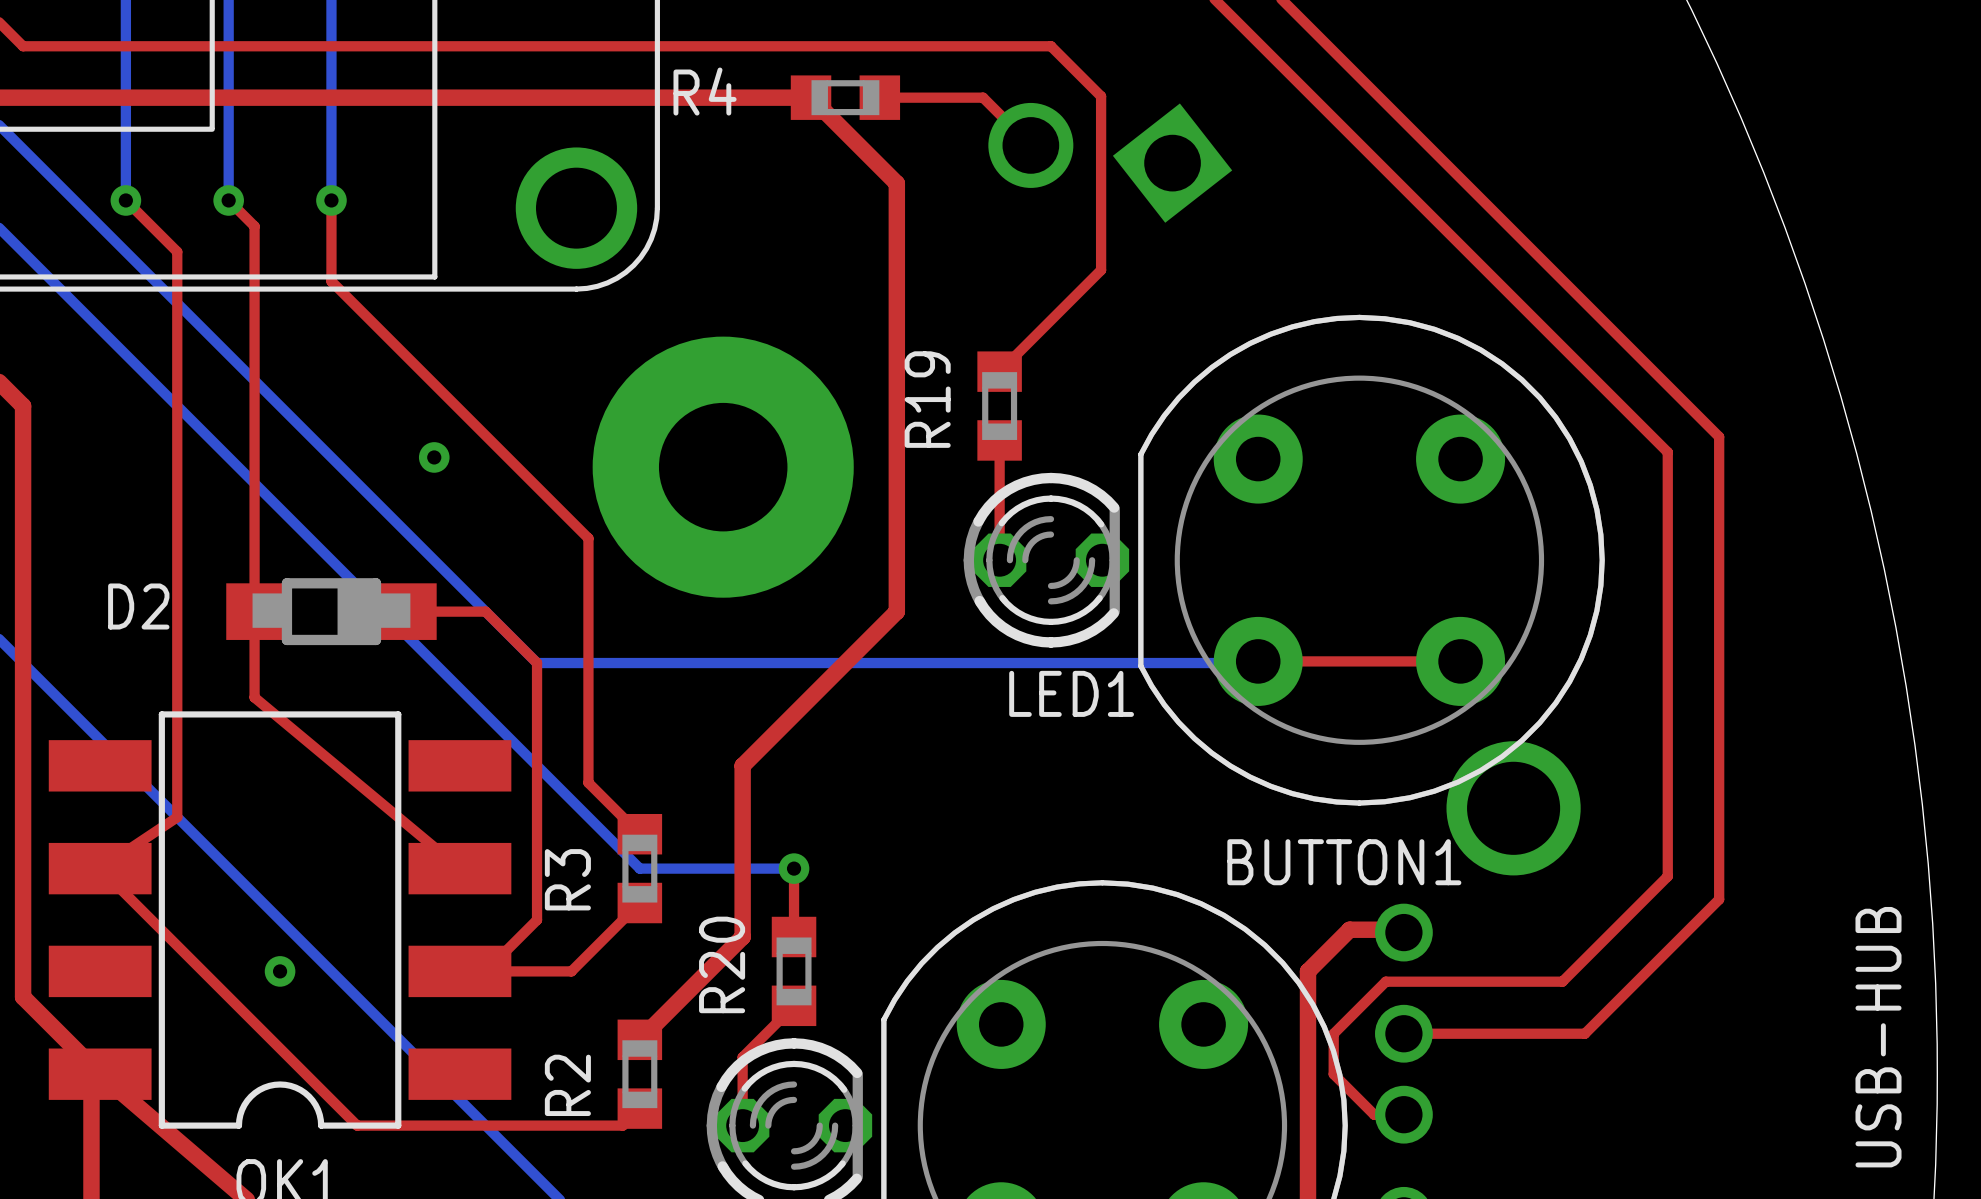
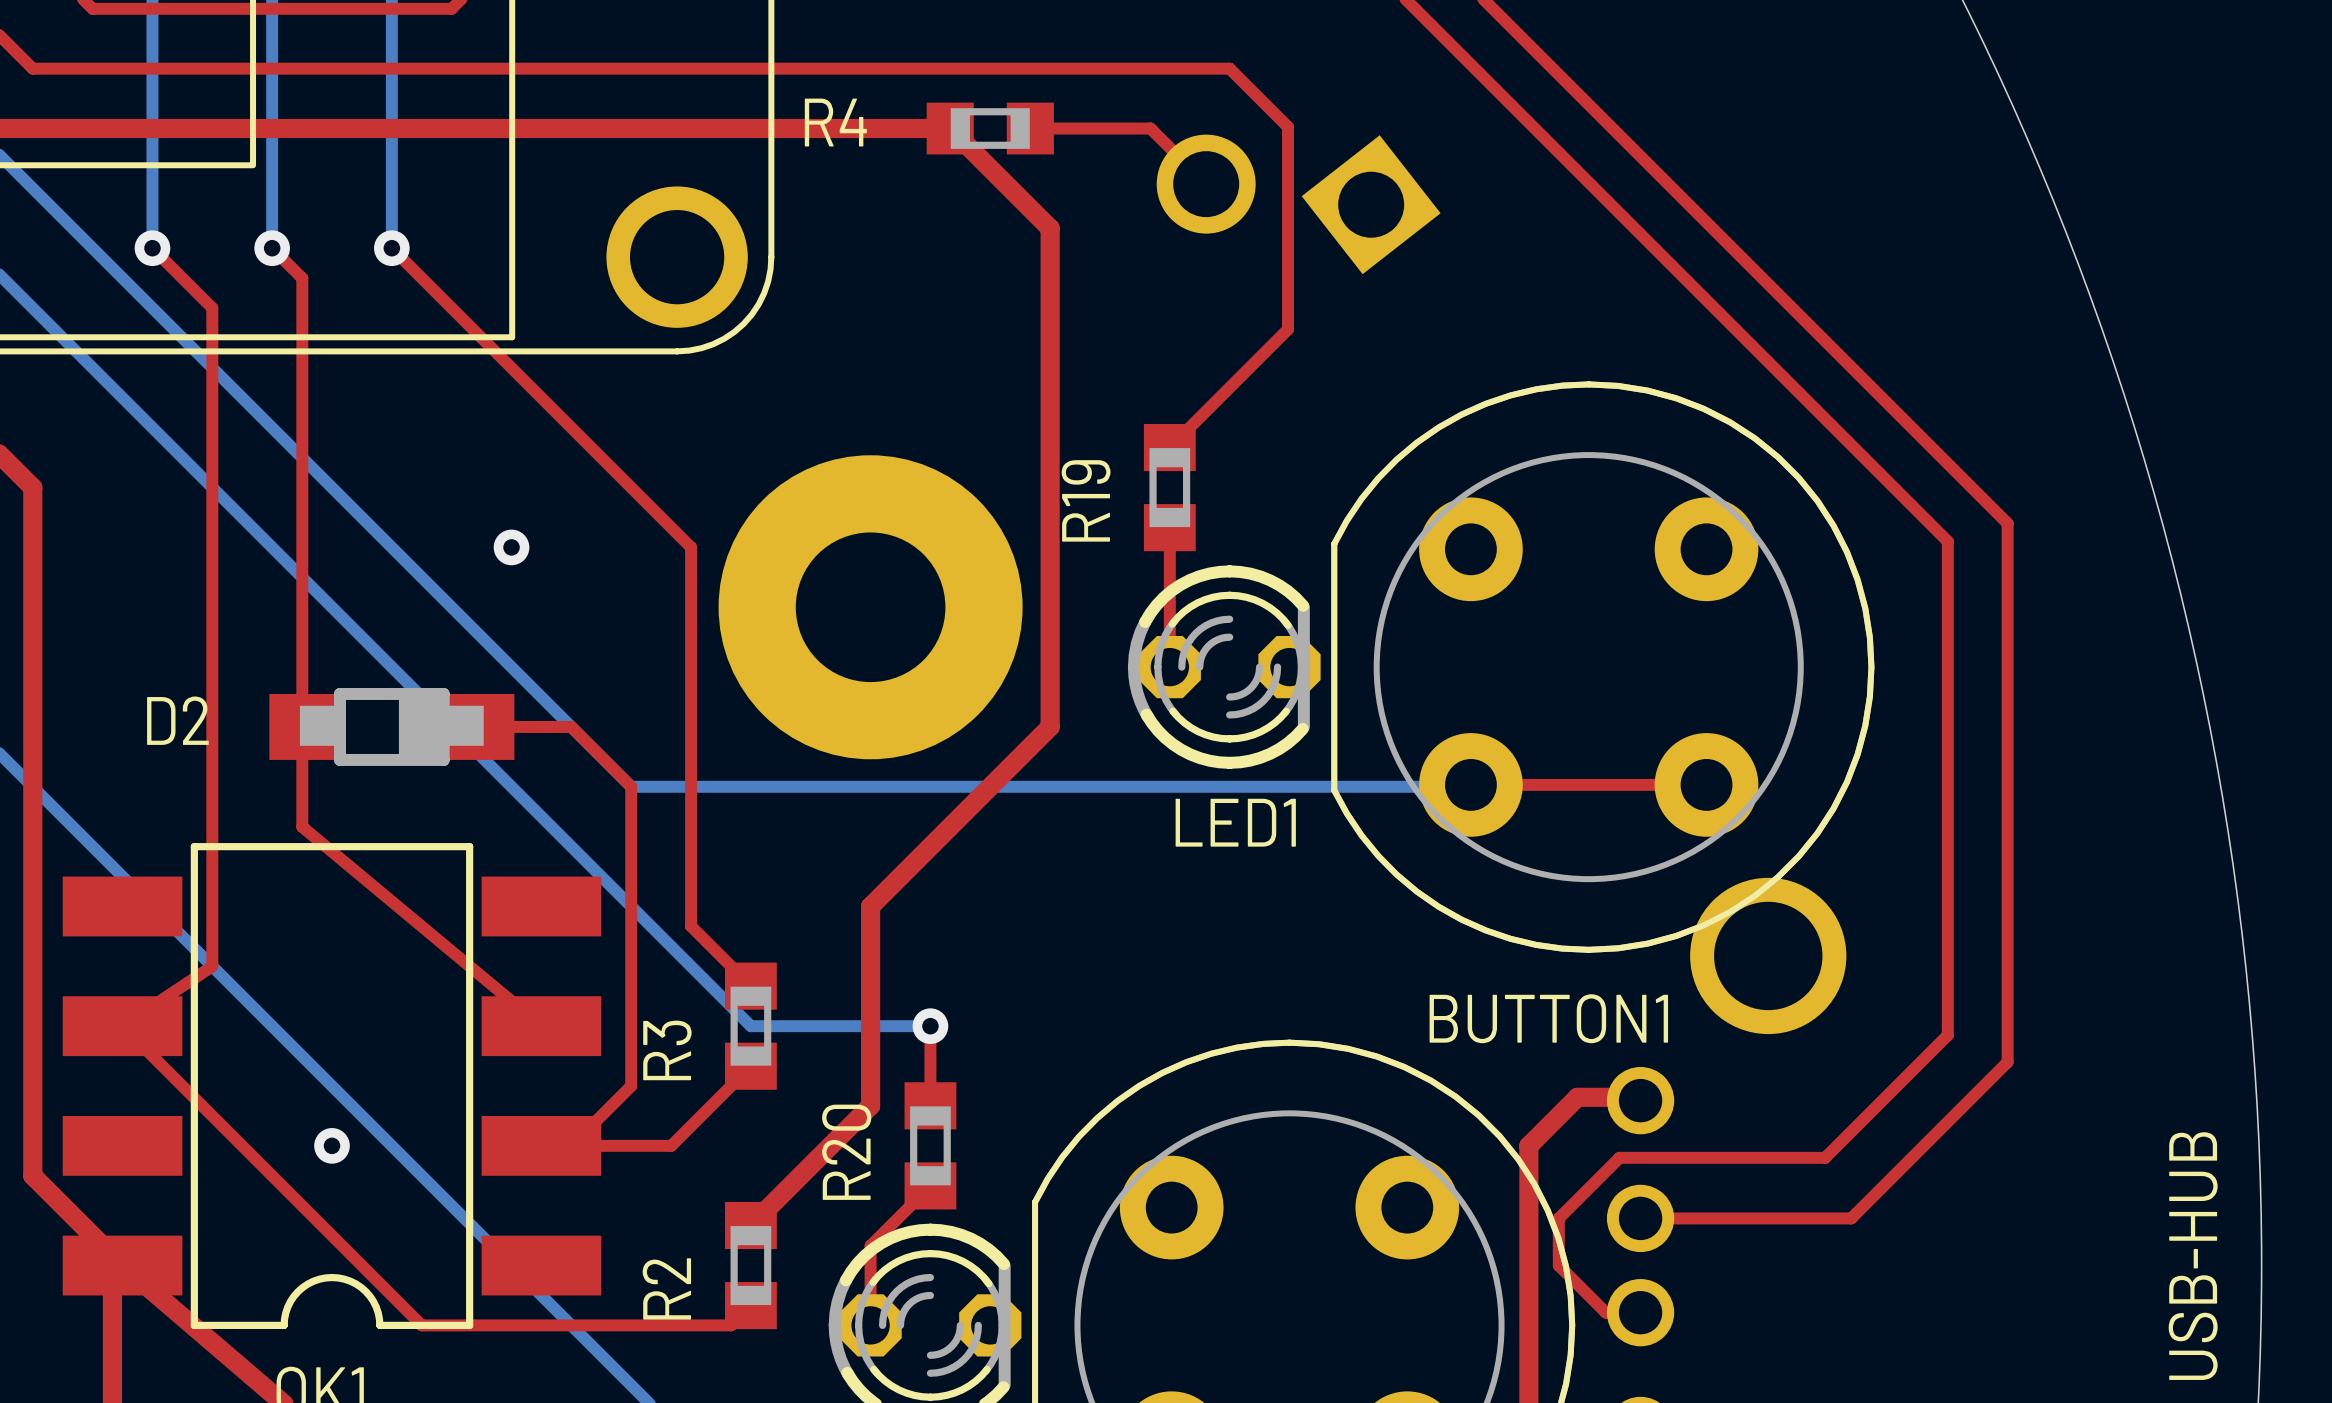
top track: (331, 200) (331, 281) (588, 538) -> (391, 248) (691, 547) (691, 641)
part position: (723, 467) -> (870, 607)

